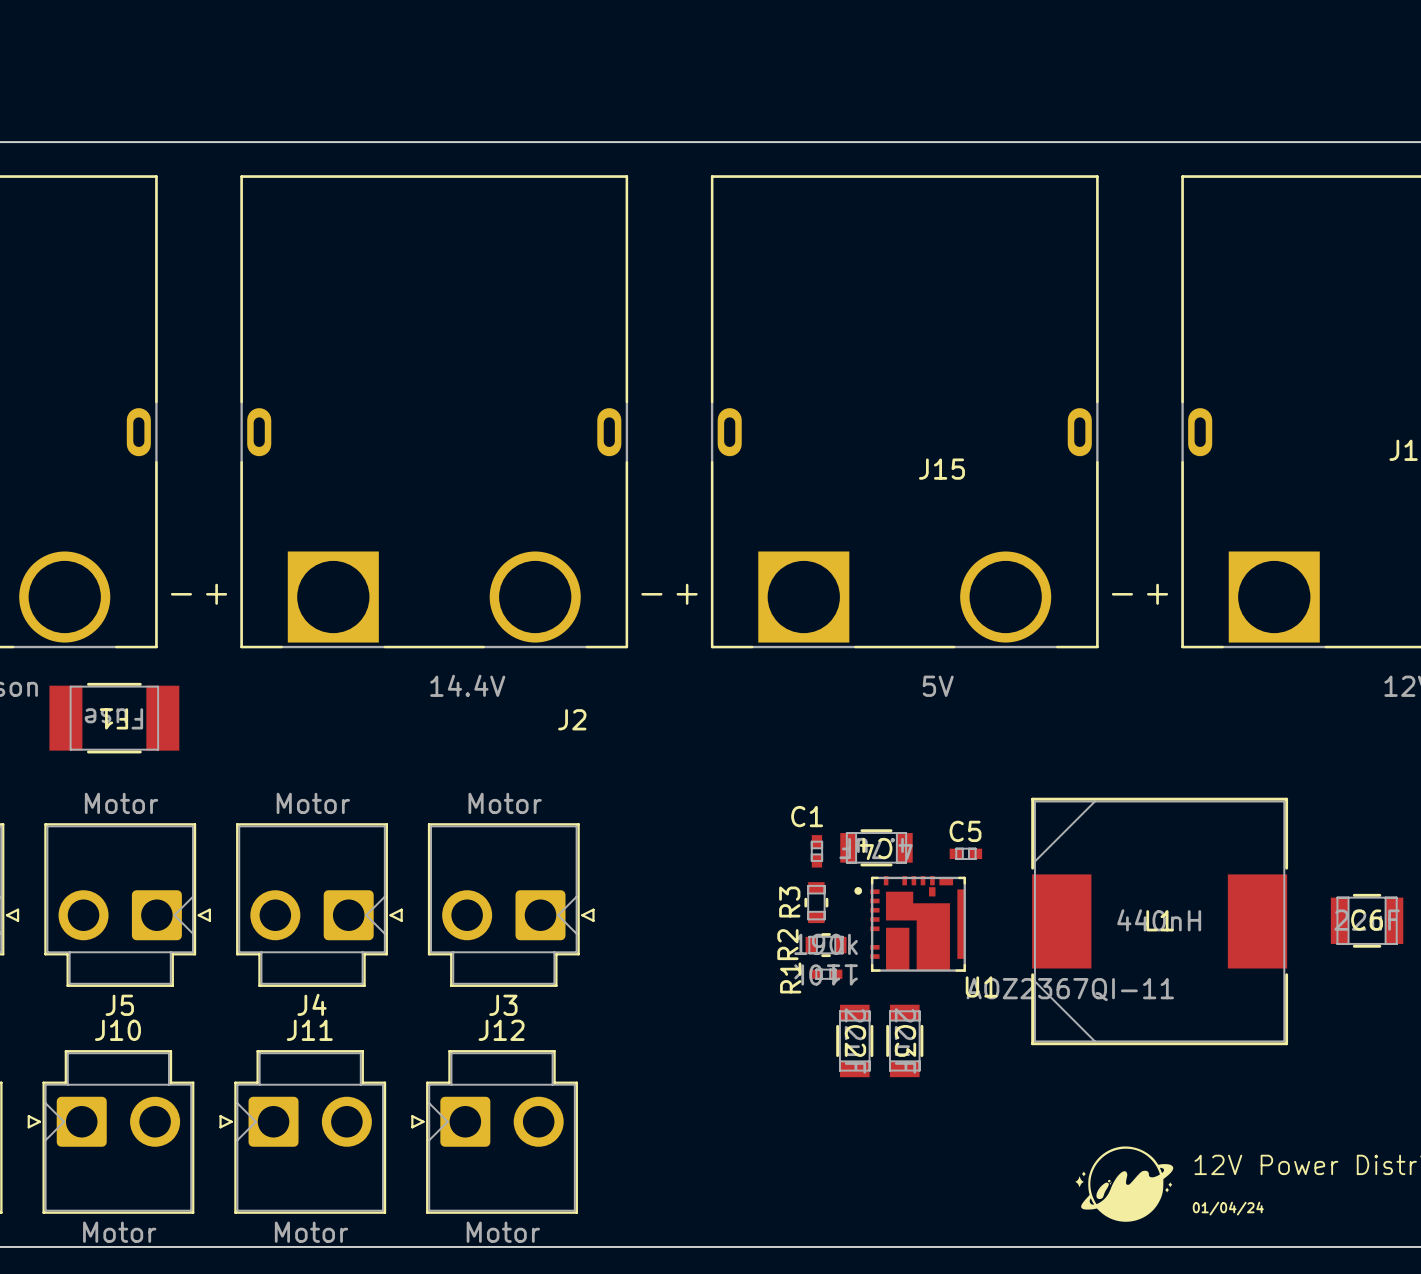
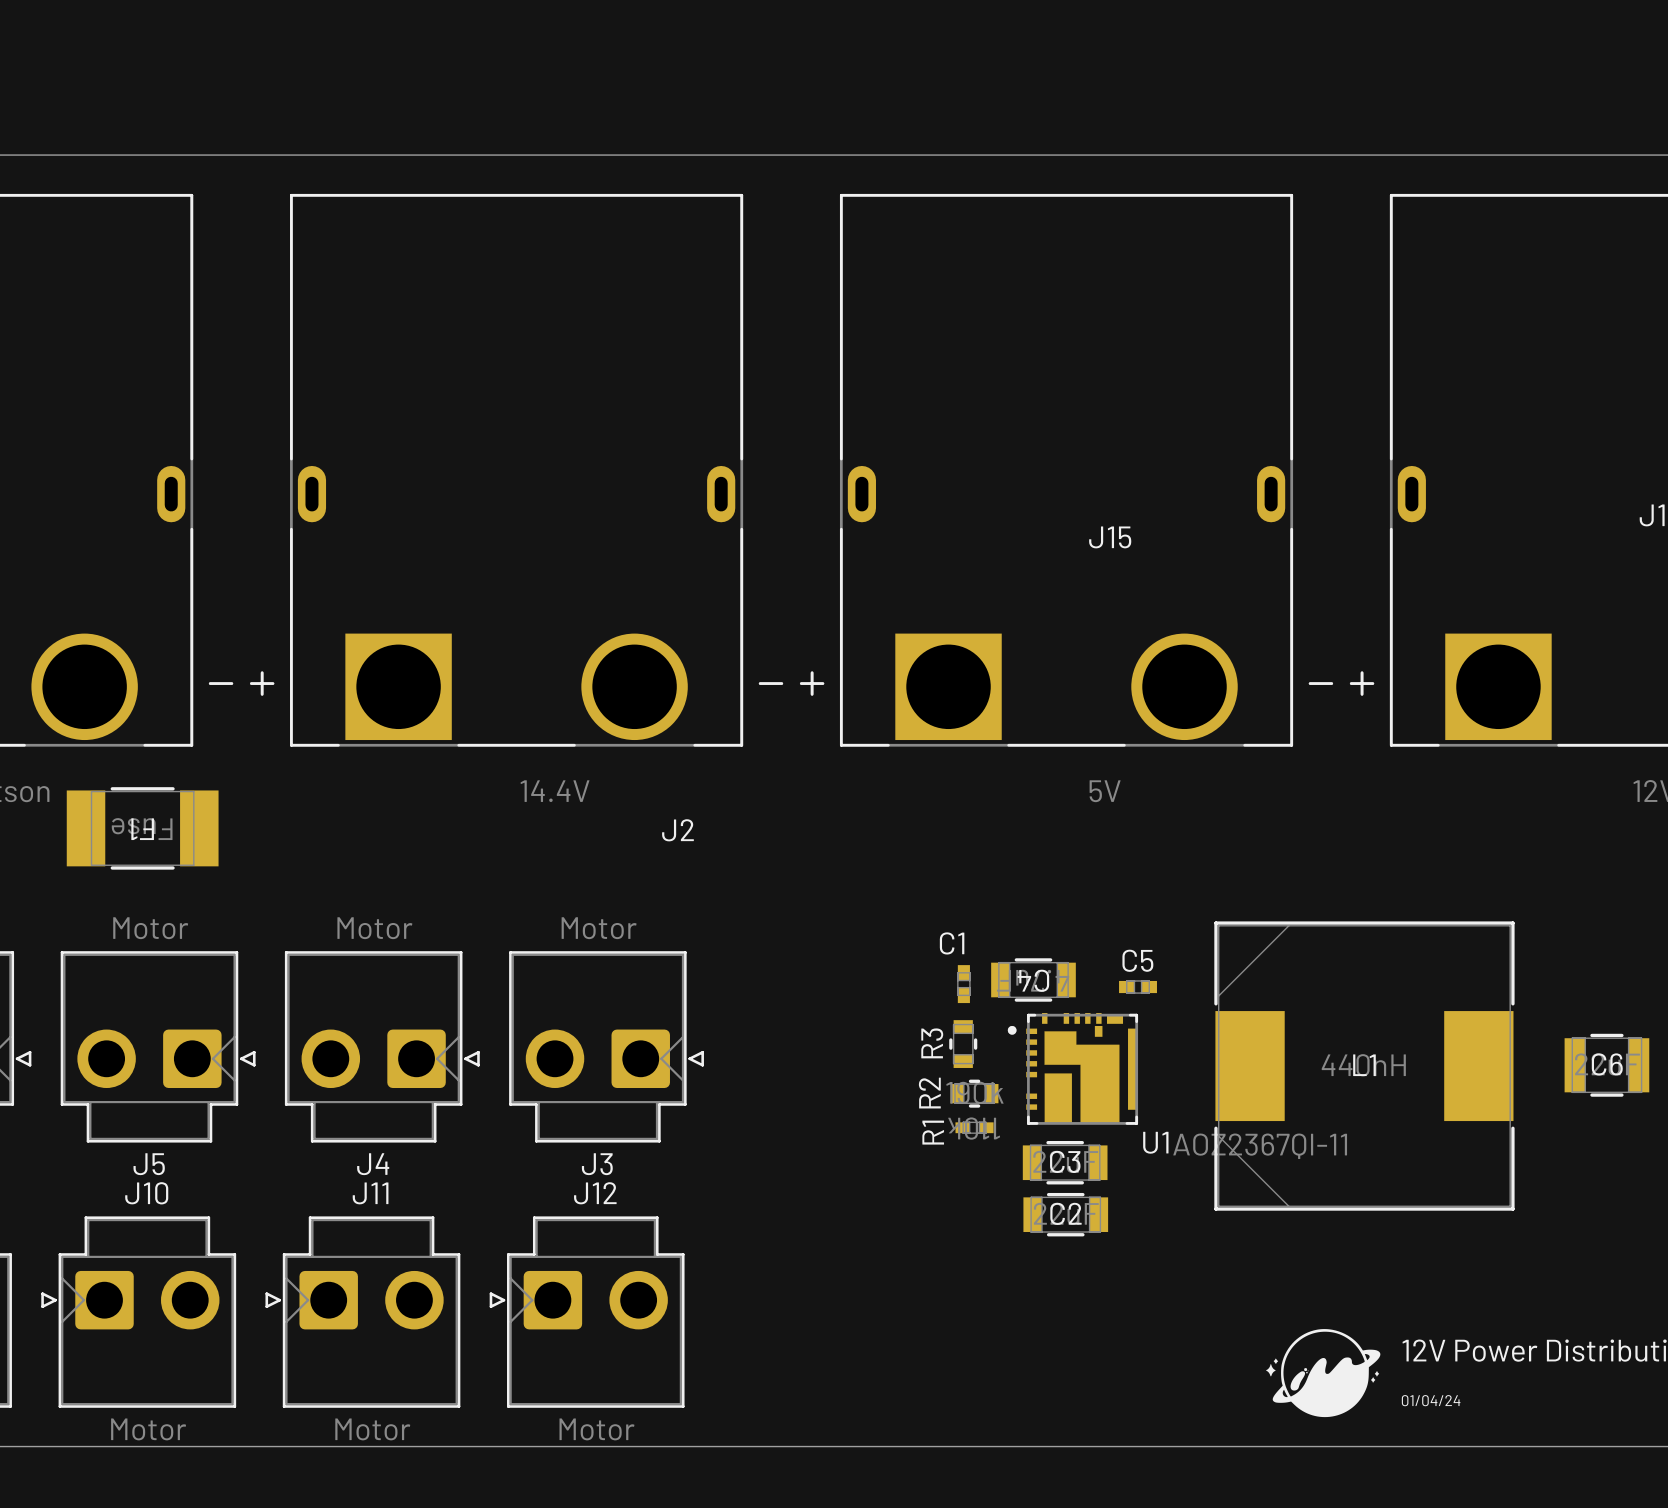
C2 rotation: 0° (854, 1040) -> 90° counterclockwise (1065, 1214)
C2 position: (854, 1040) -> (1065, 1214)
C3 rotation: 0° (904, 1040) -> 90° counterclockwise (1065, 1162)

